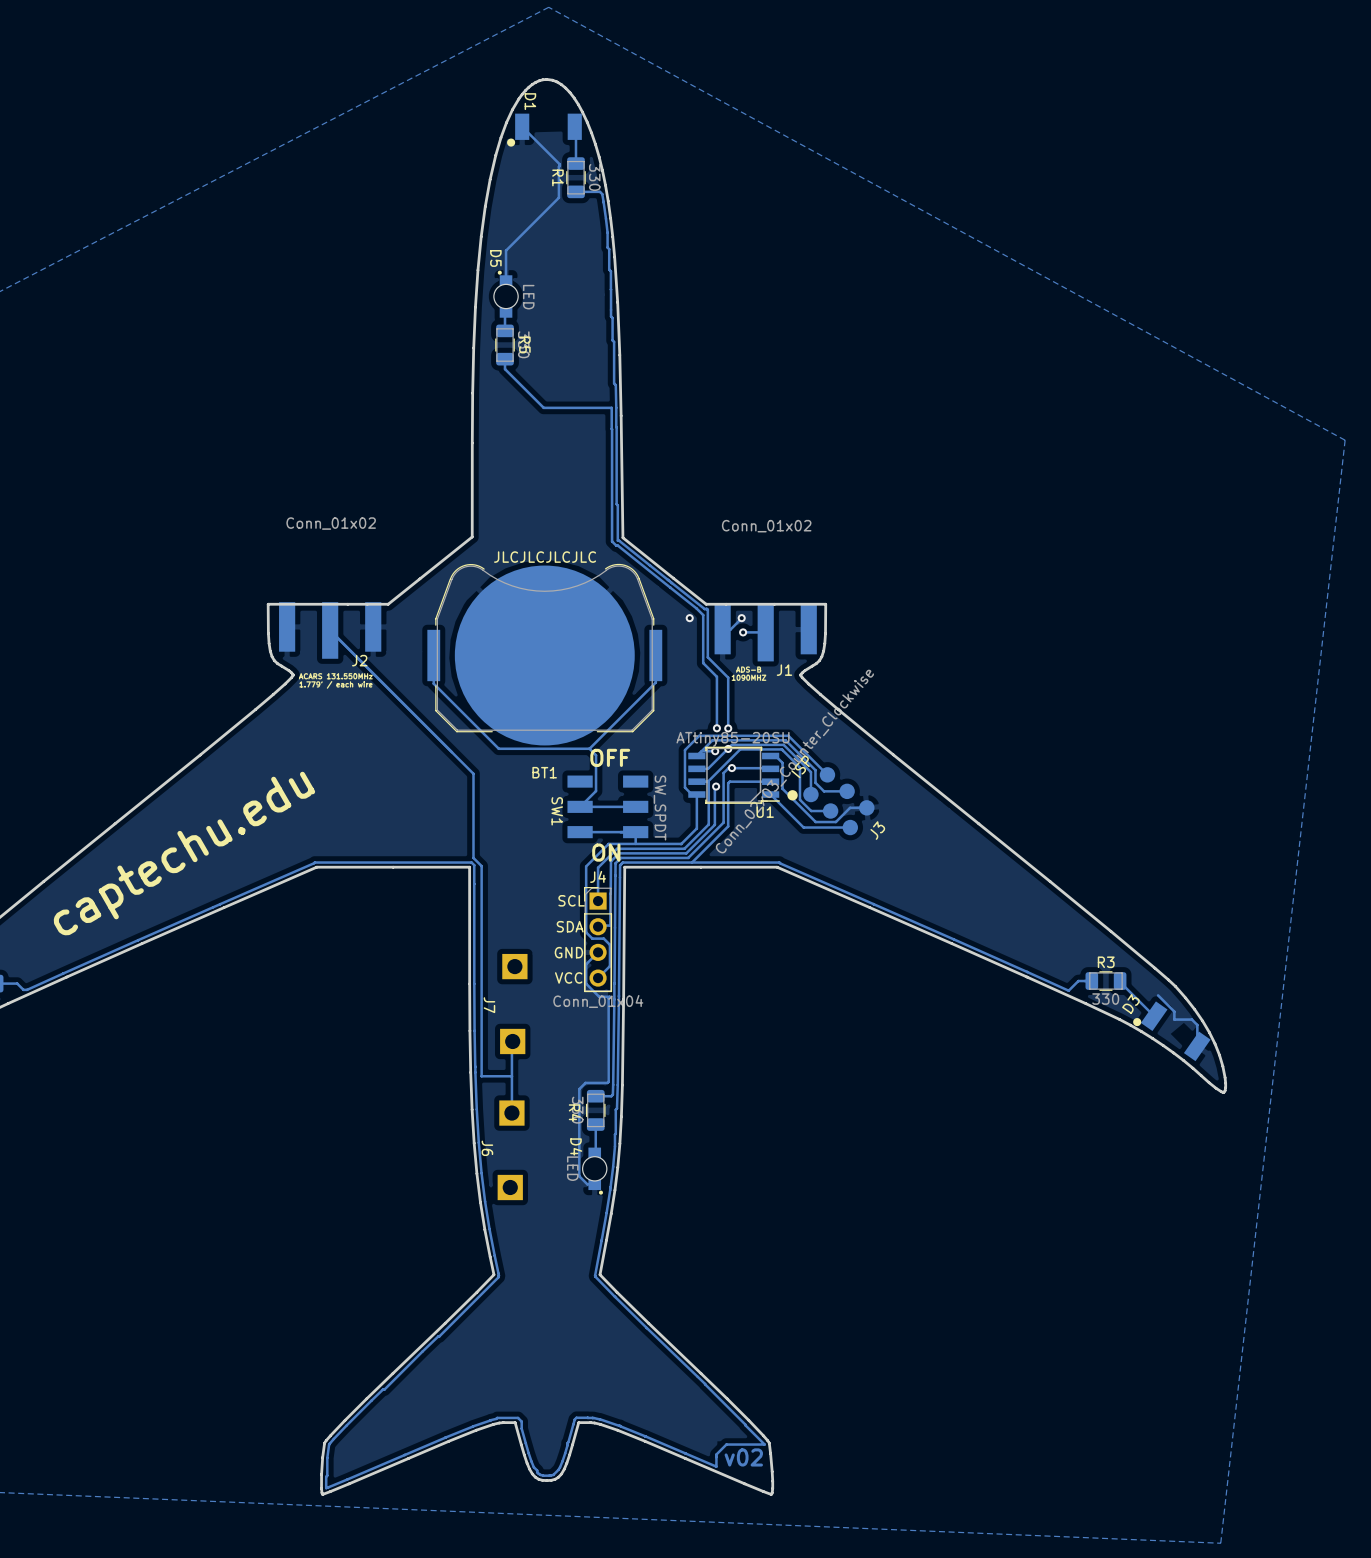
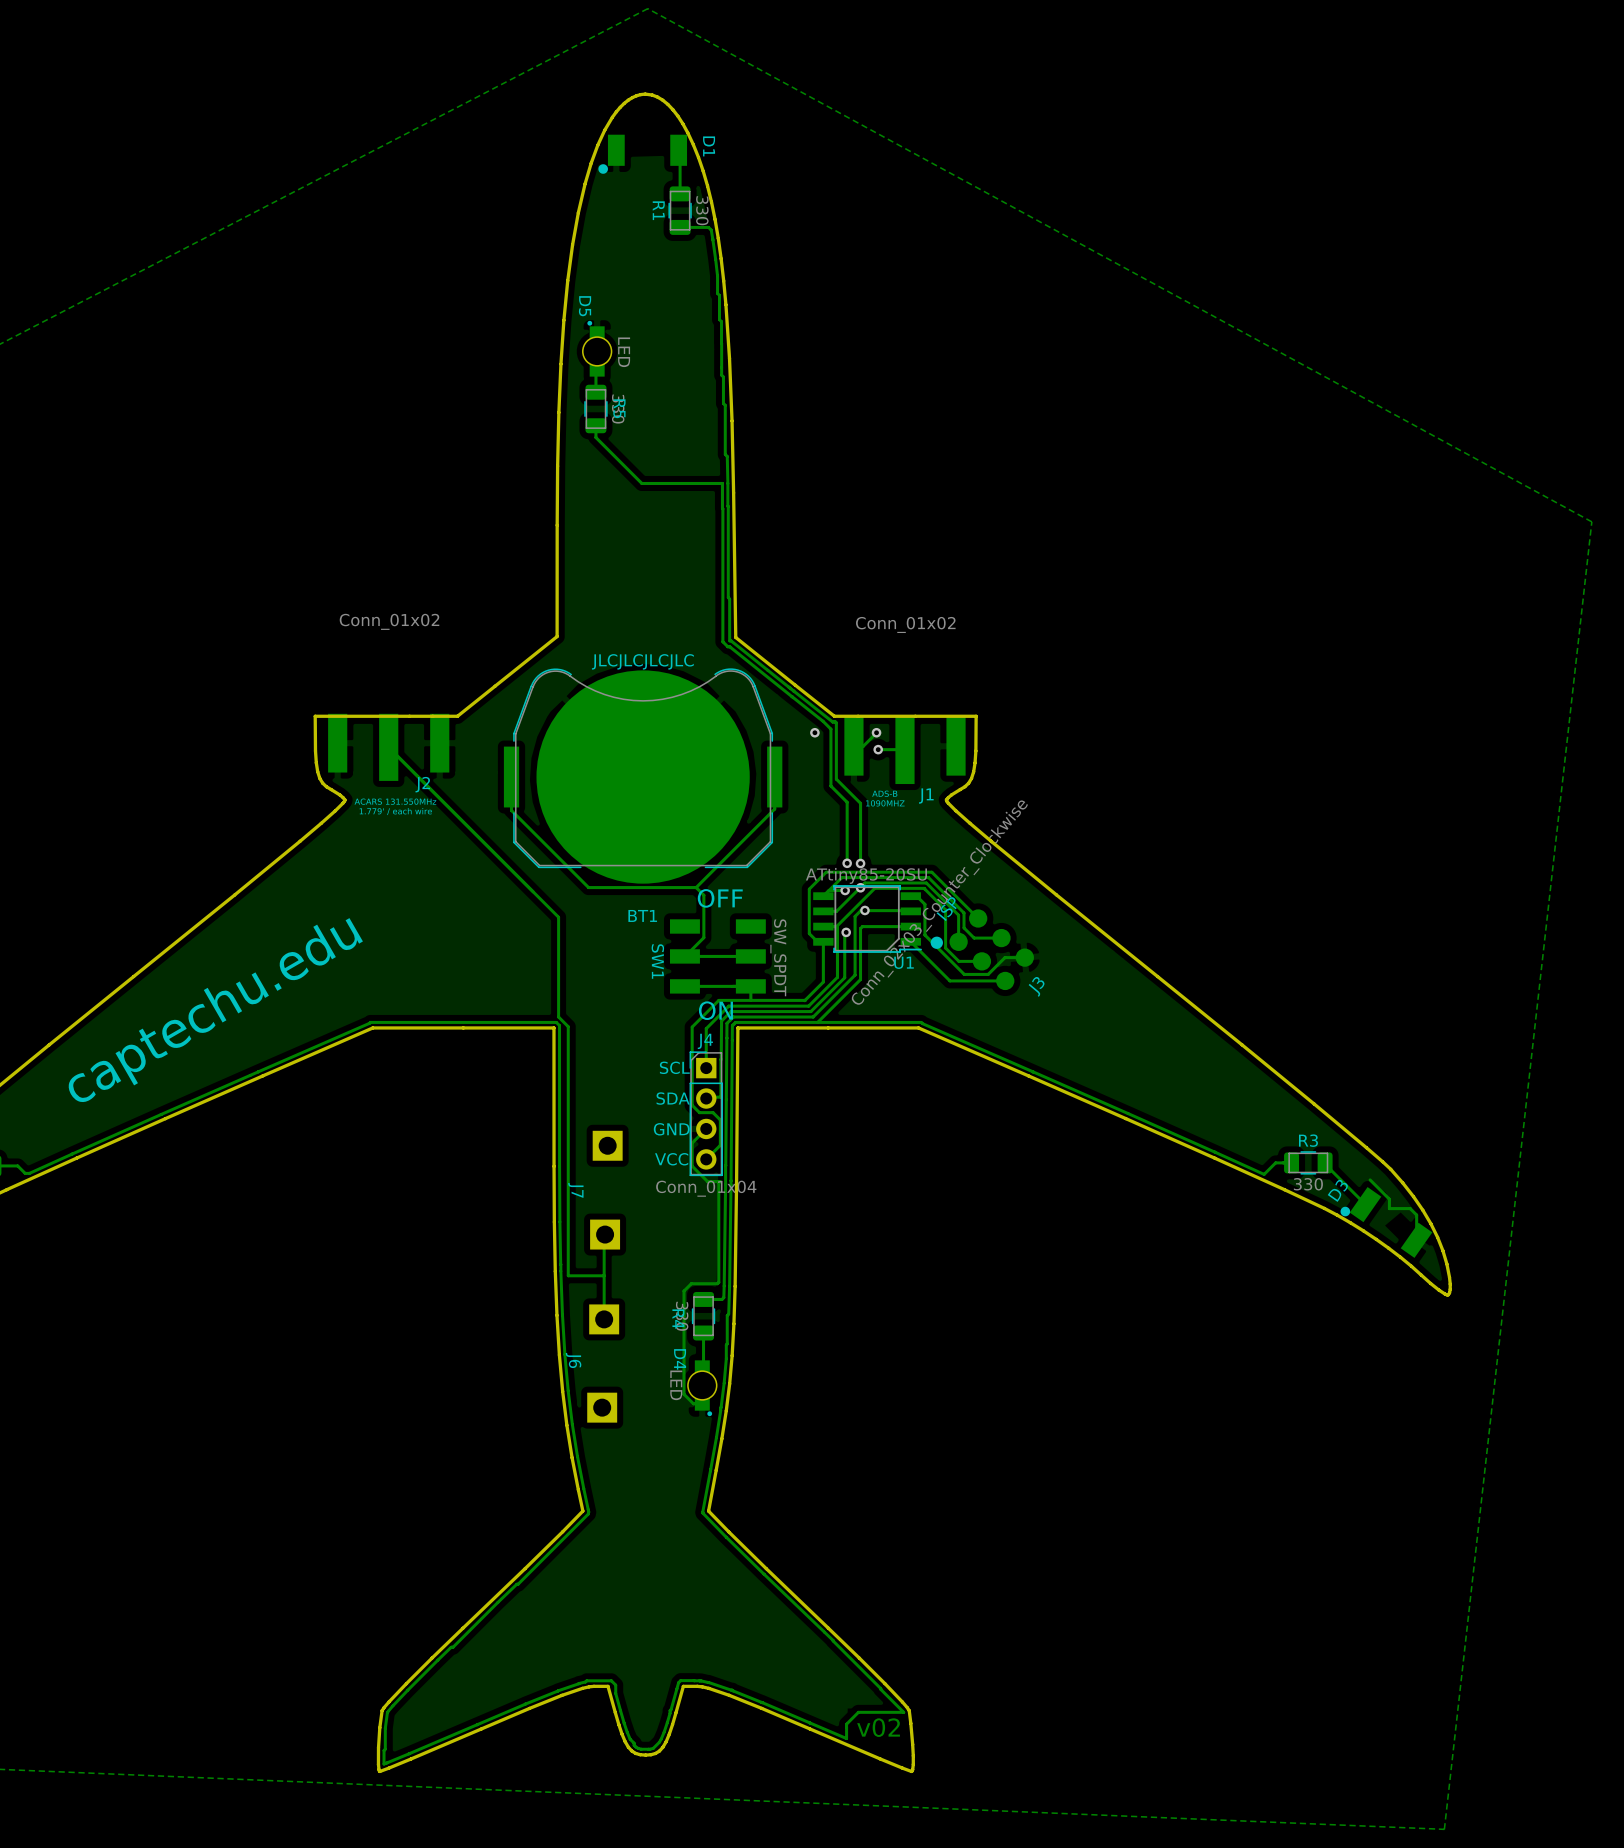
D1 name position: D1 (530, 101) -> D1 (709, 146)
track: (522, 126) (559, 164) (558, 197) (506, 250) (506, 280) -> none

